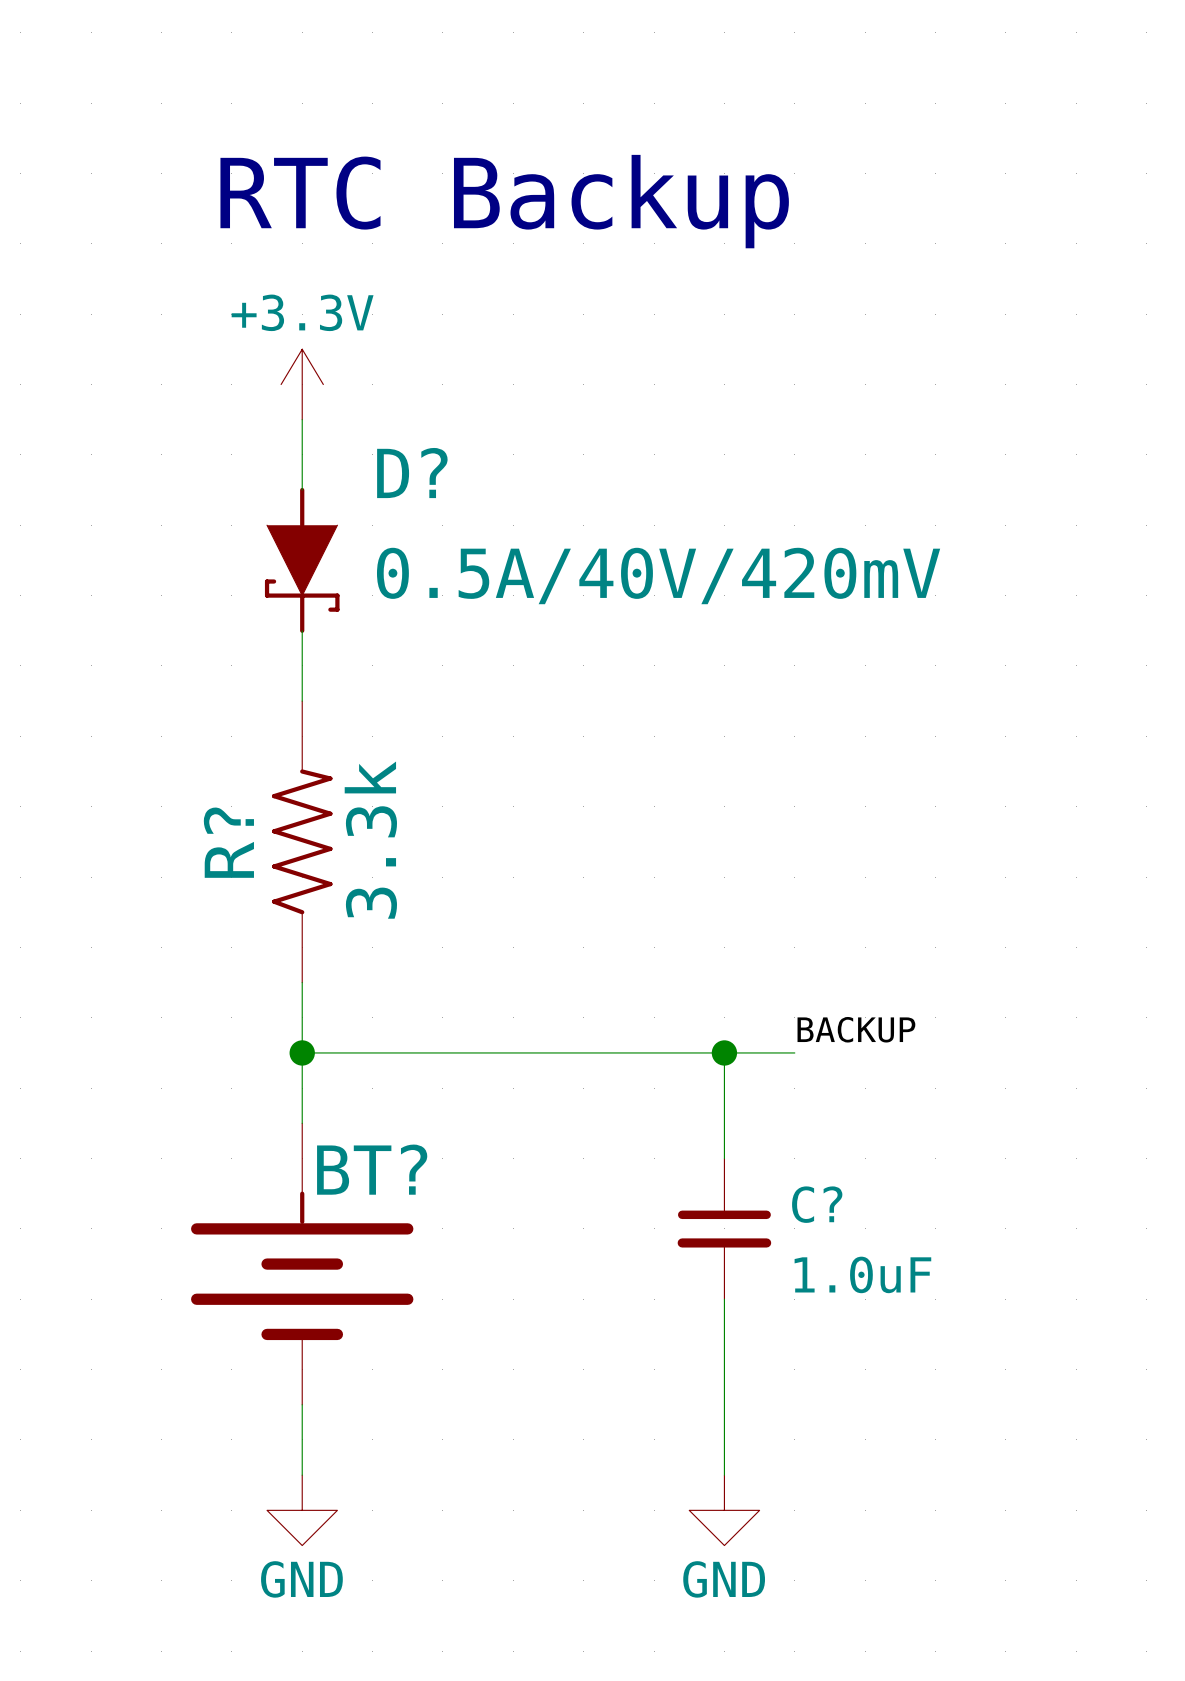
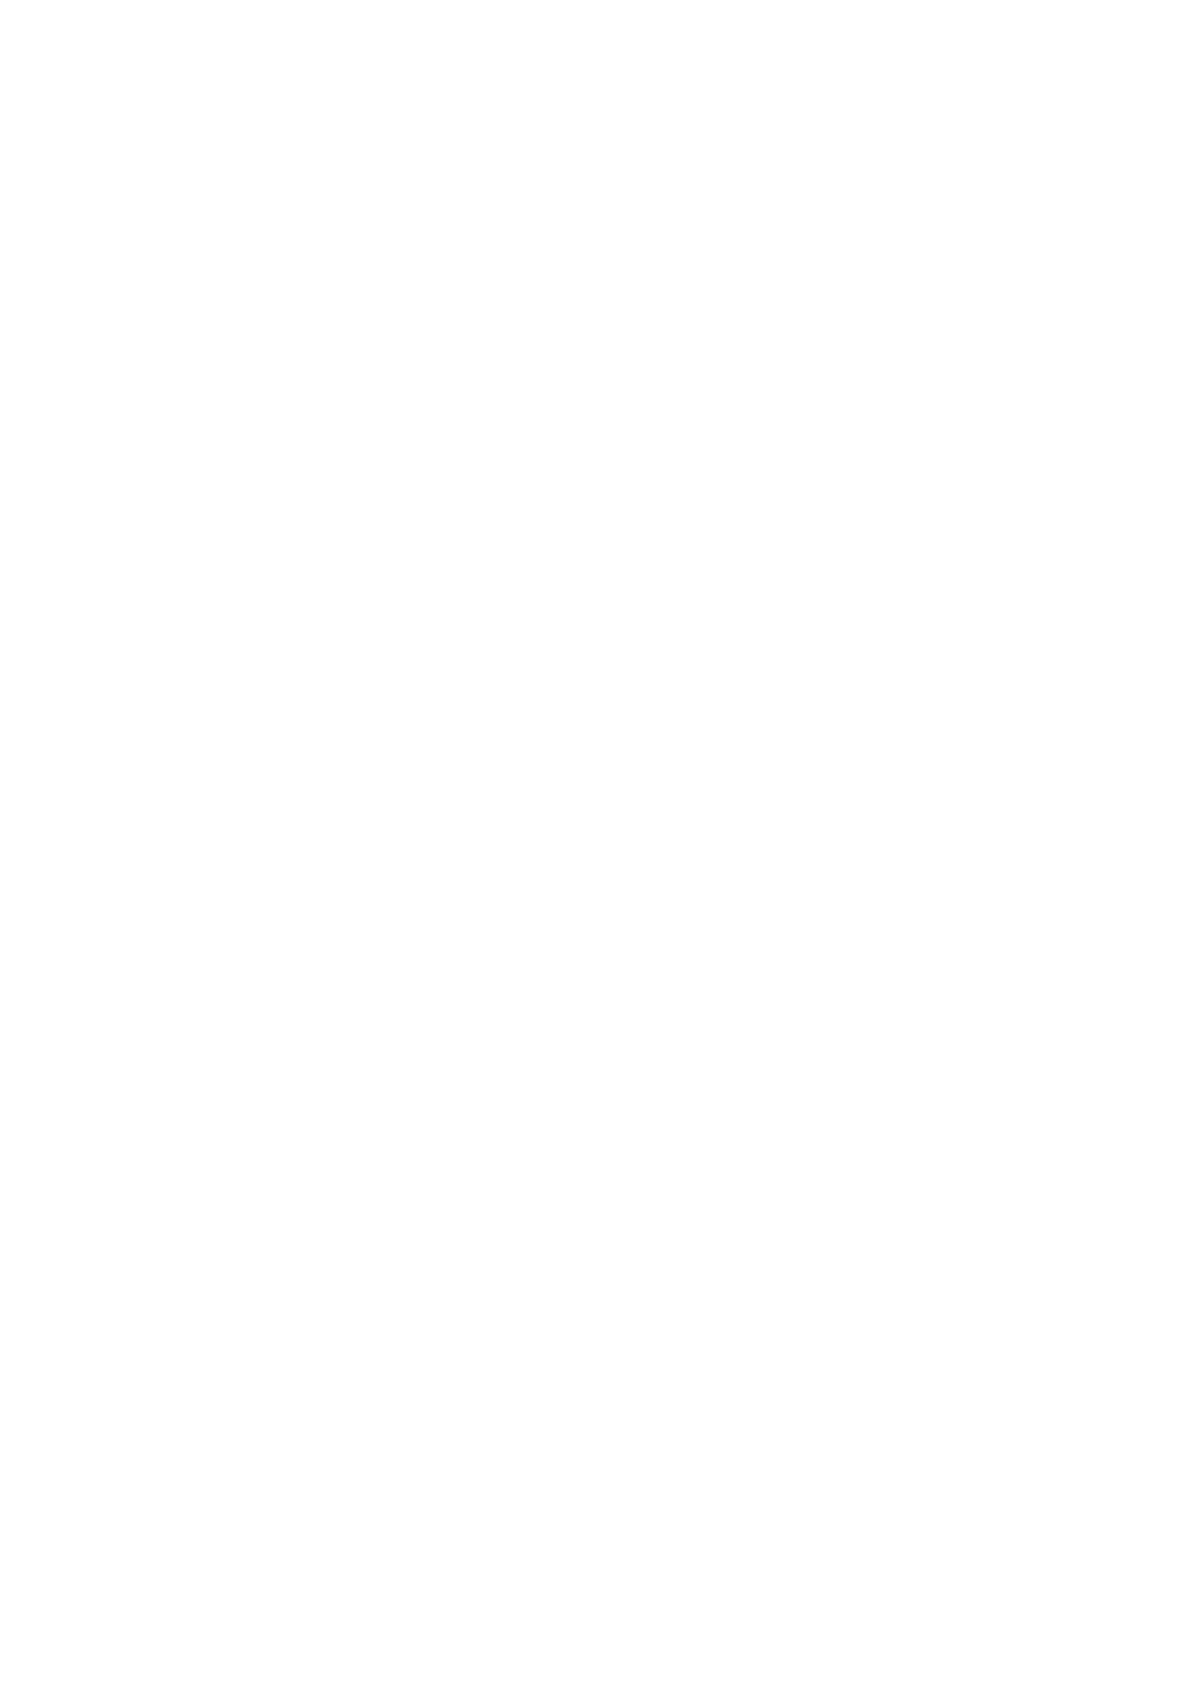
text: RTC Backup (504, 201) -> none
power symbol: +3.3V (302, 384) -> none
wire: (302, 419) (302, 490) -> none
D?: 0.5A/40V/420mV (302, 560) -> none
wire: (302, 630) (302, 701) -> none
R?: 3.3k (302, 841) -> none
wire: (302, 982) (302, 1123) -> none
label: BACKUP (856, 1029) -> none
wire: (302, 1052) (794, 1052) -> none
junction: (302, 1052) -> none
wire: (724, 1052) (724, 1158) -> none
junction: (724, 1052) -> none
C?: 1.0uF (724, 1228) -> none
BT?: (302, 1264) -> none
wire: (724, 1299) (724, 1475) -> none
wire: (302, 1404) (302, 1475) -> none
power symbol: GND (302, 1510) -> none
power symbol: GND (724, 1510) -> none

